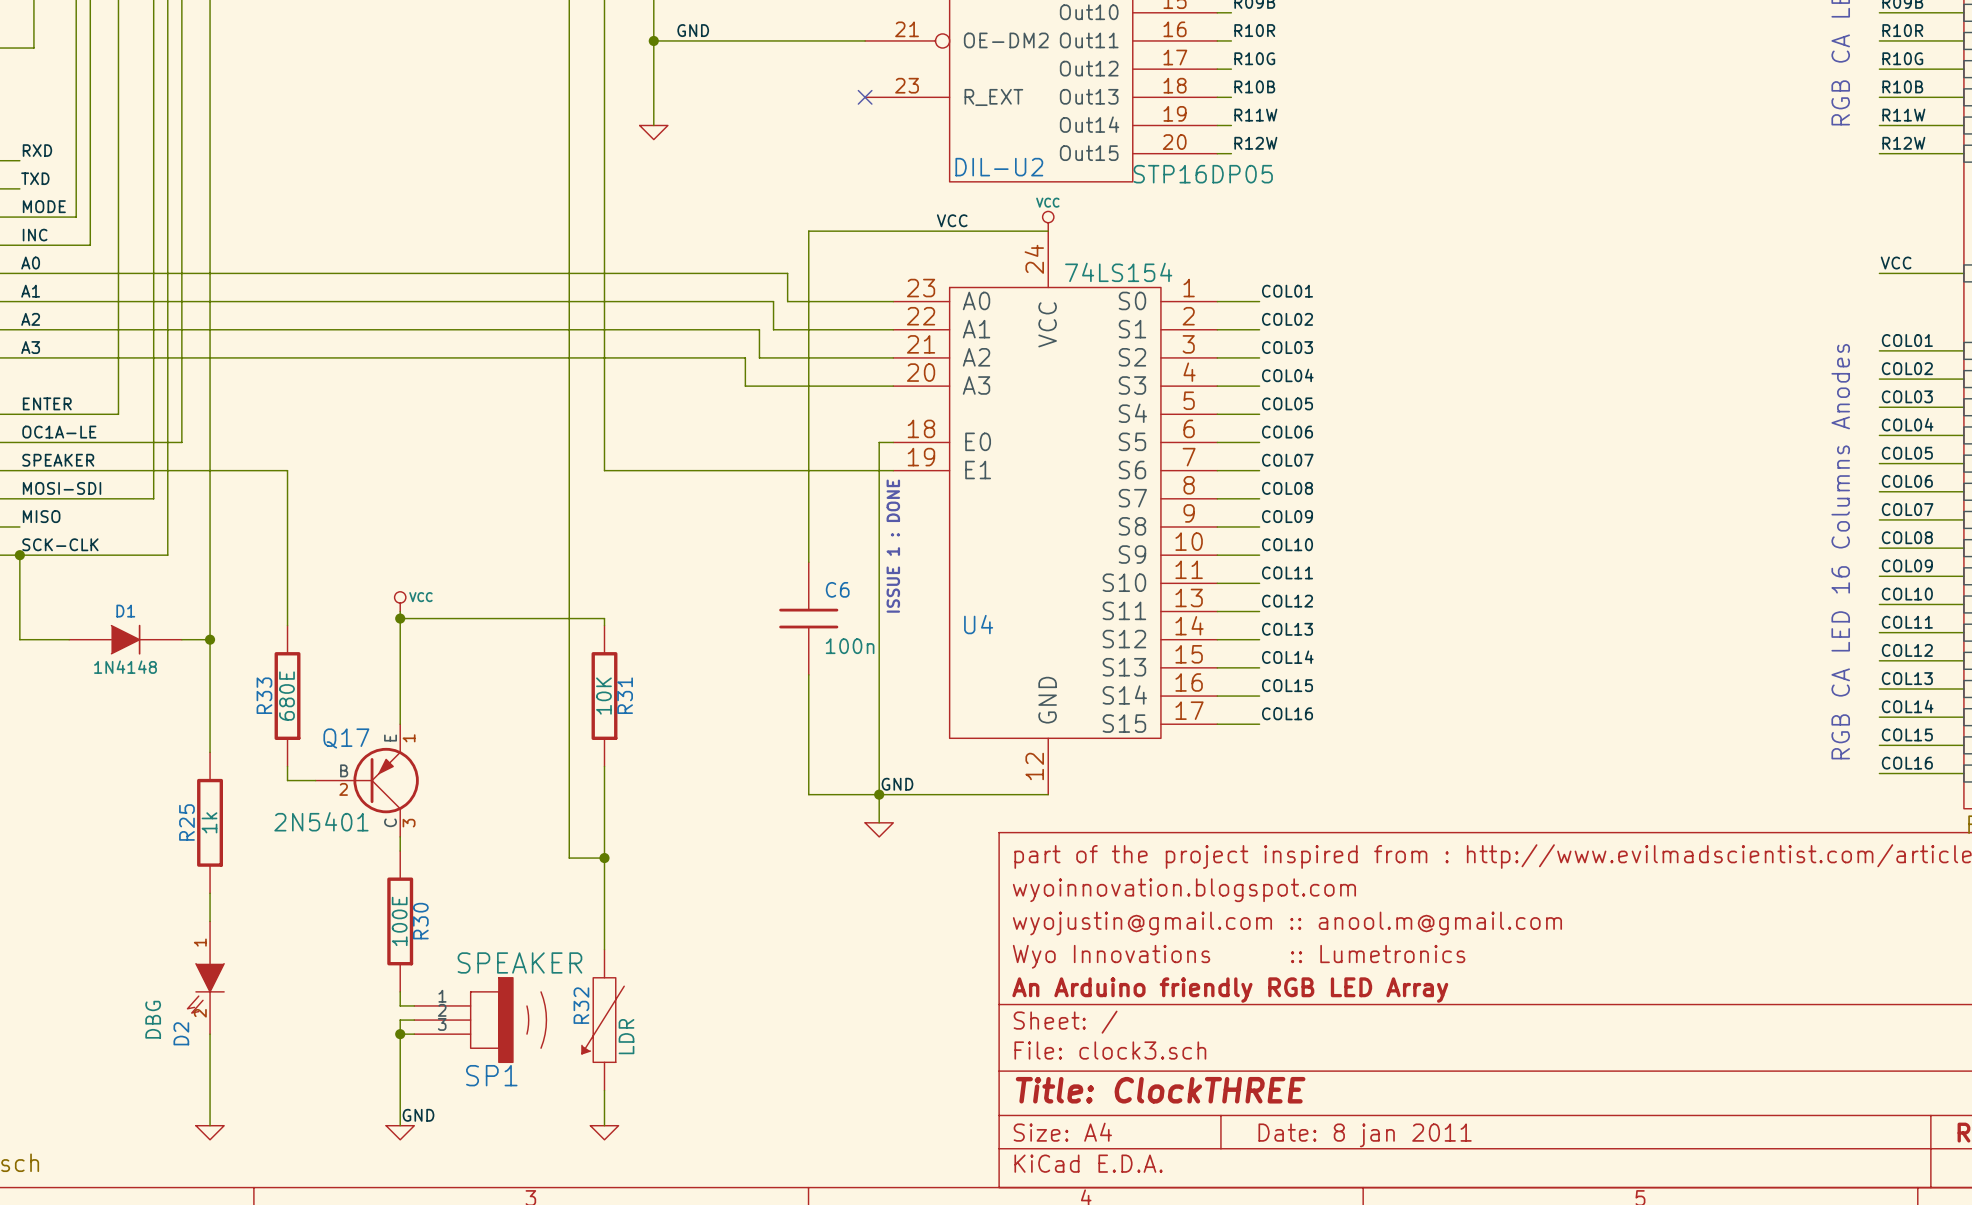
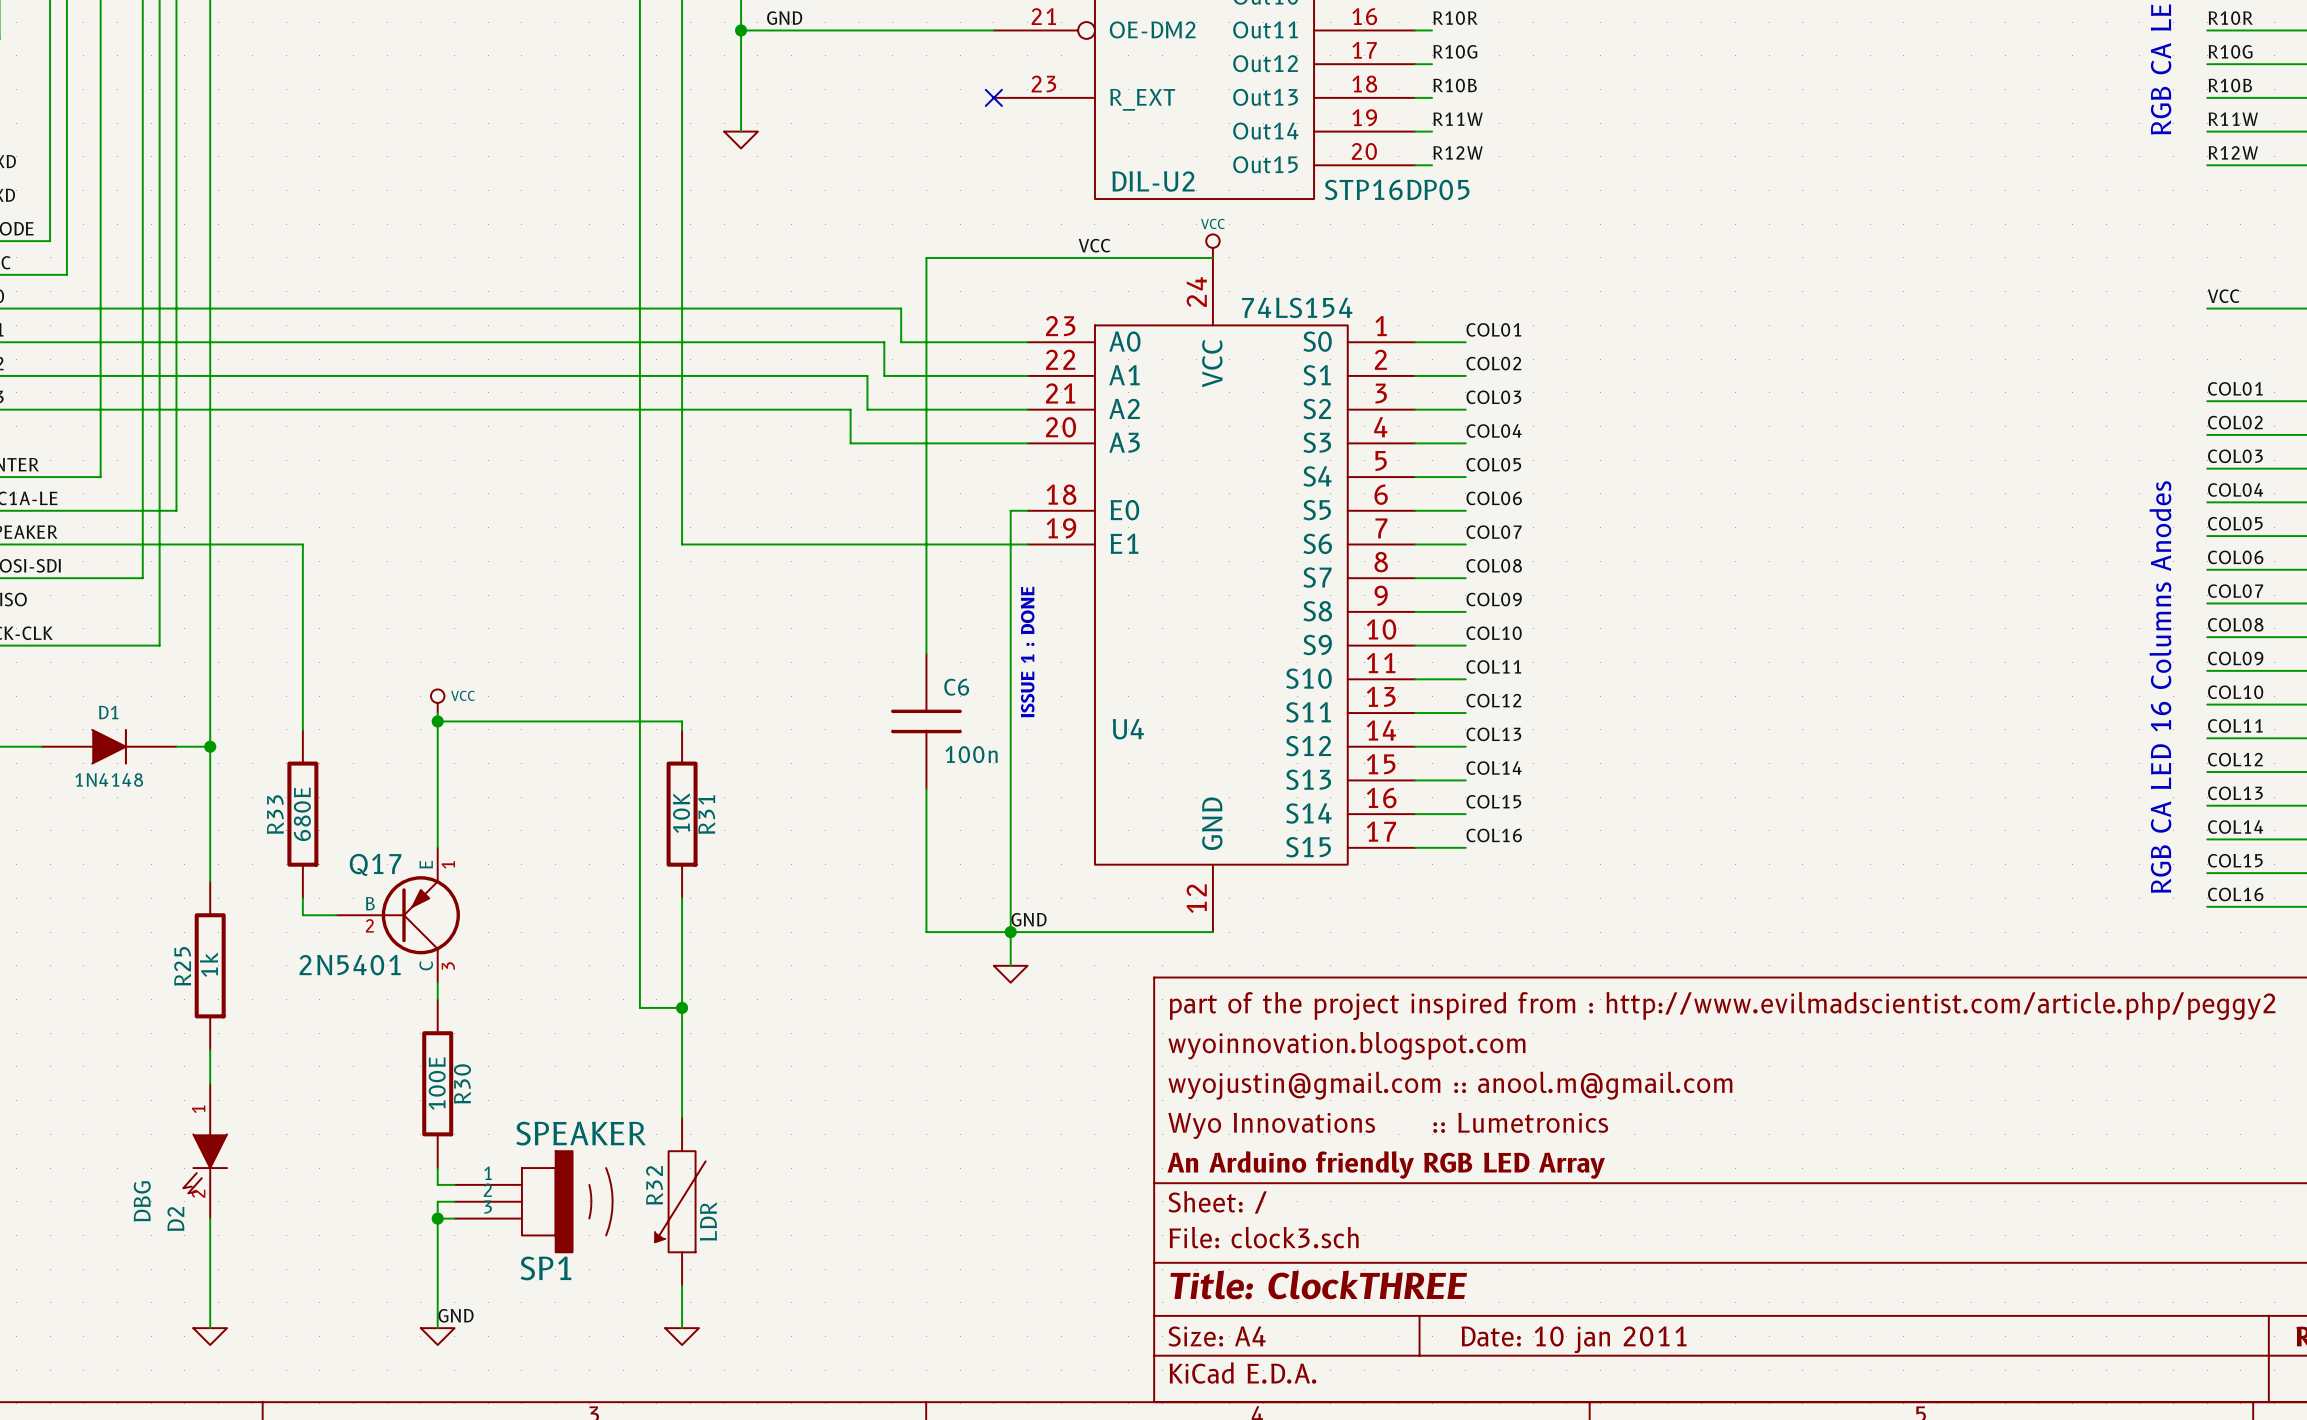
title block: Date: 8 jan 2011 (1365, 1135) -> Date: 10 jan 2011 (1574, 1339)

